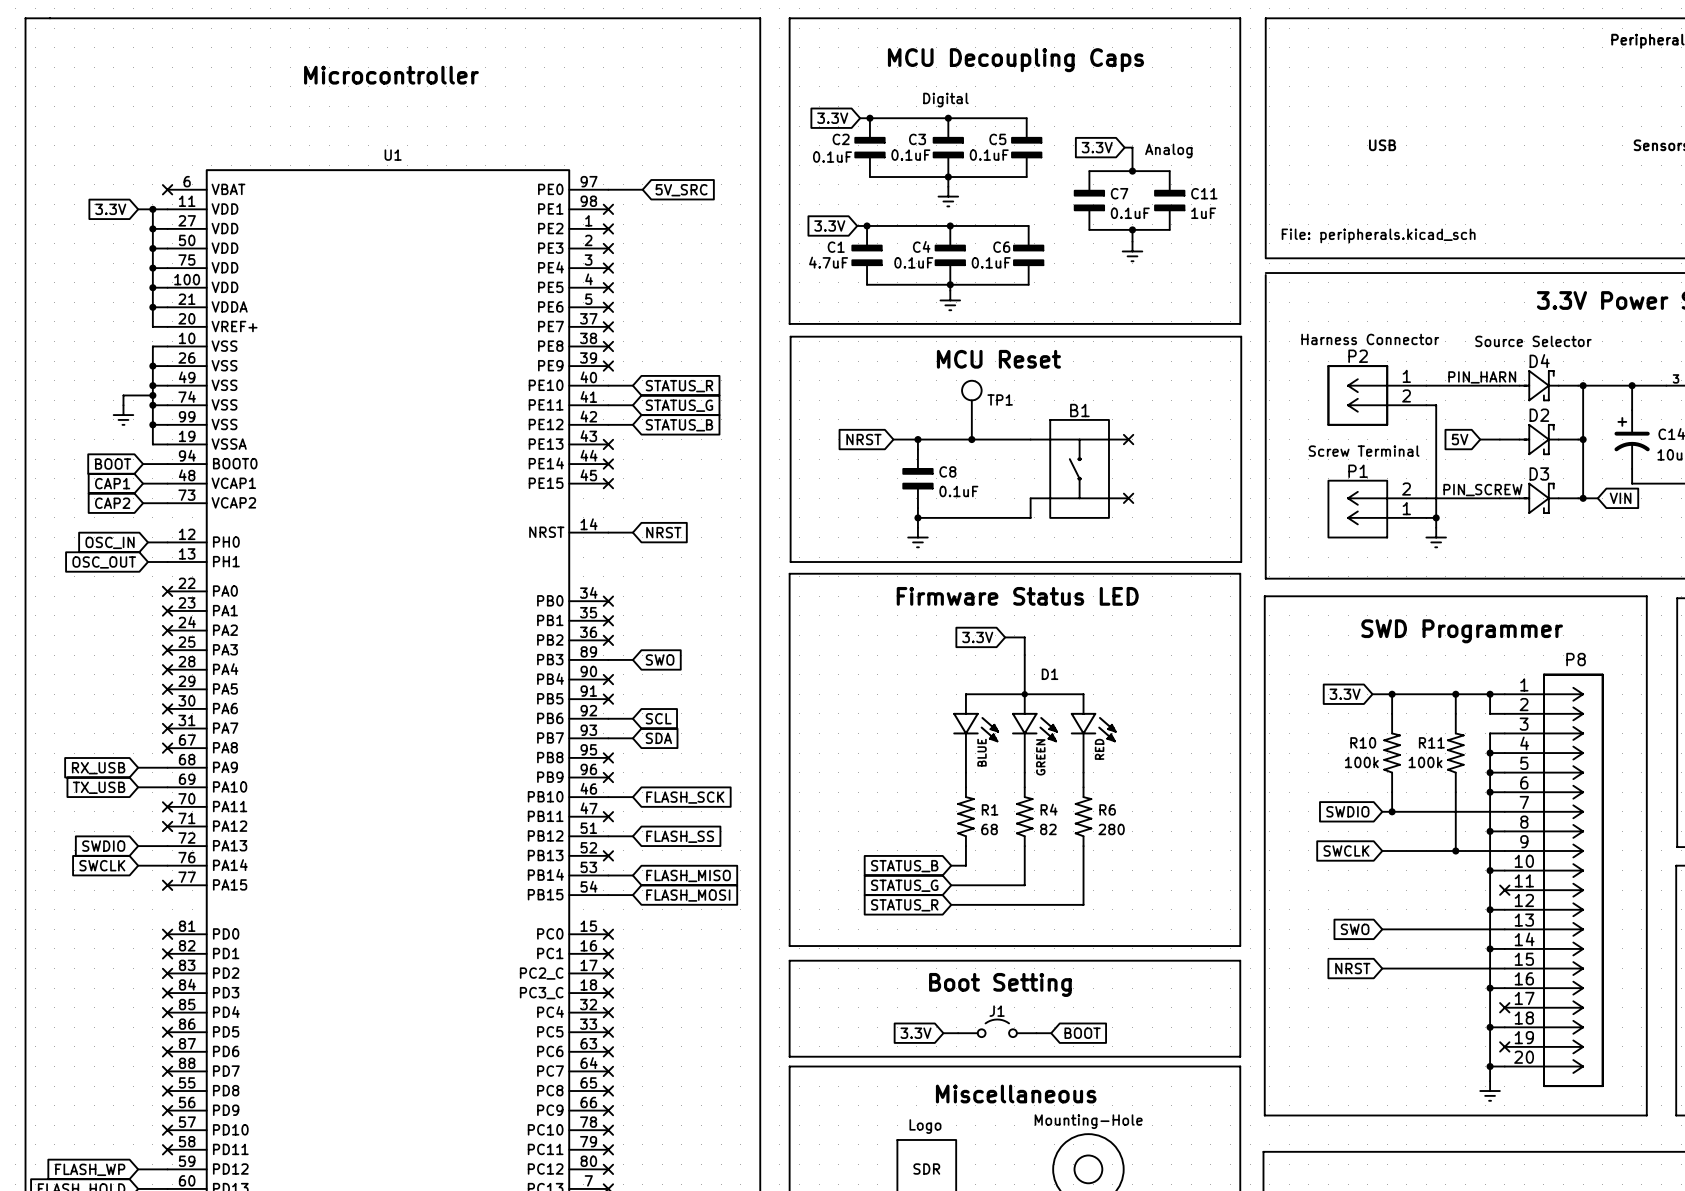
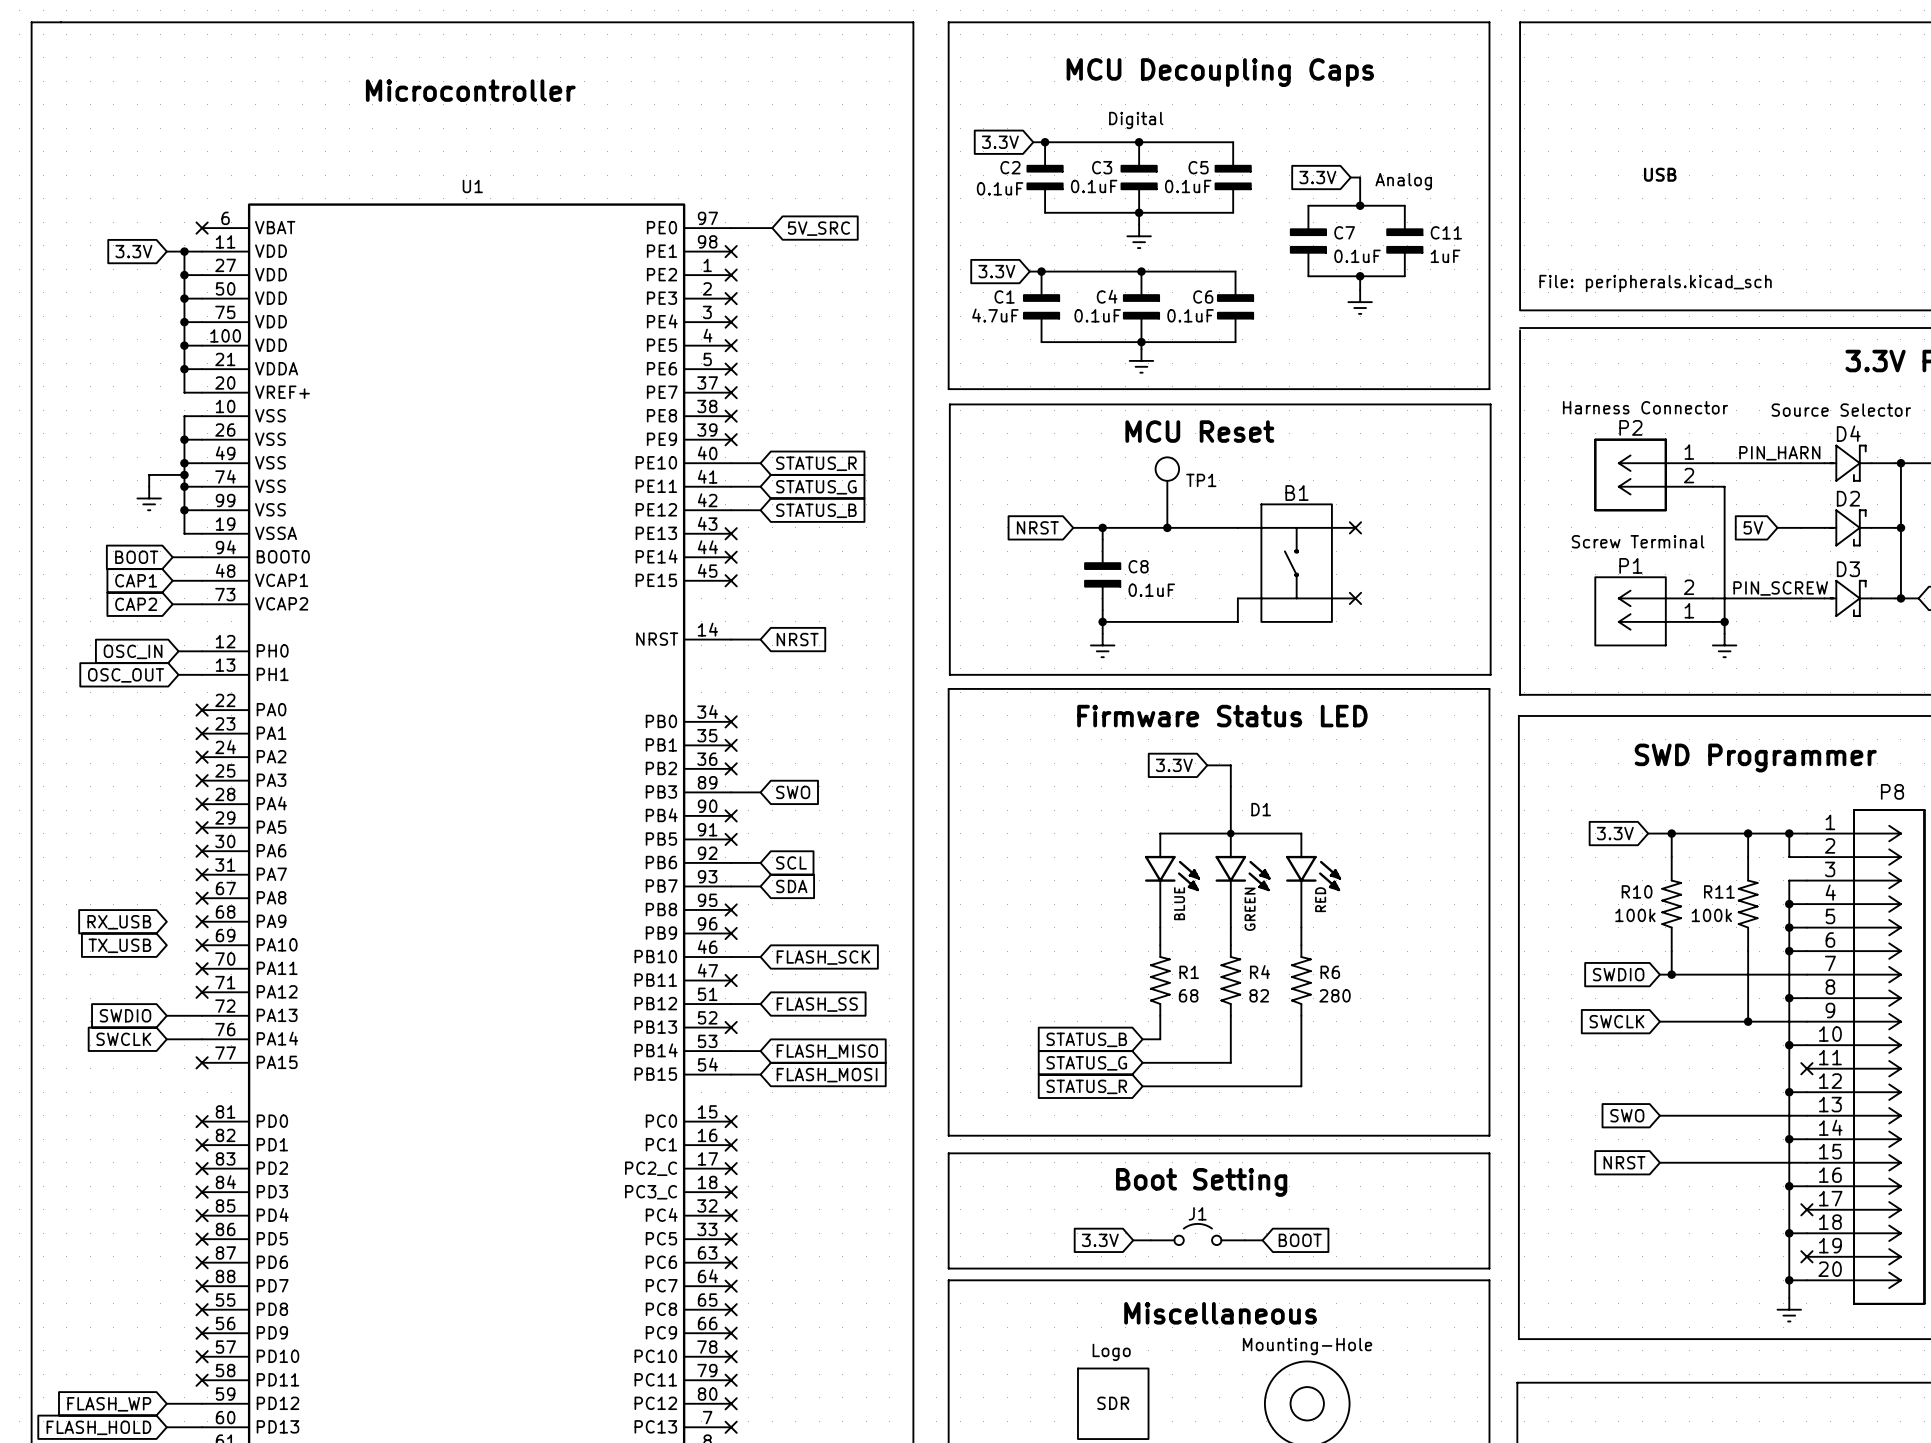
wire: (138, 767) (167, 767) -> none
no-connect mark: none -> (202, 921)
wire: (138, 787) (167, 787) -> none
no-connect mark: none -> (202, 945)

